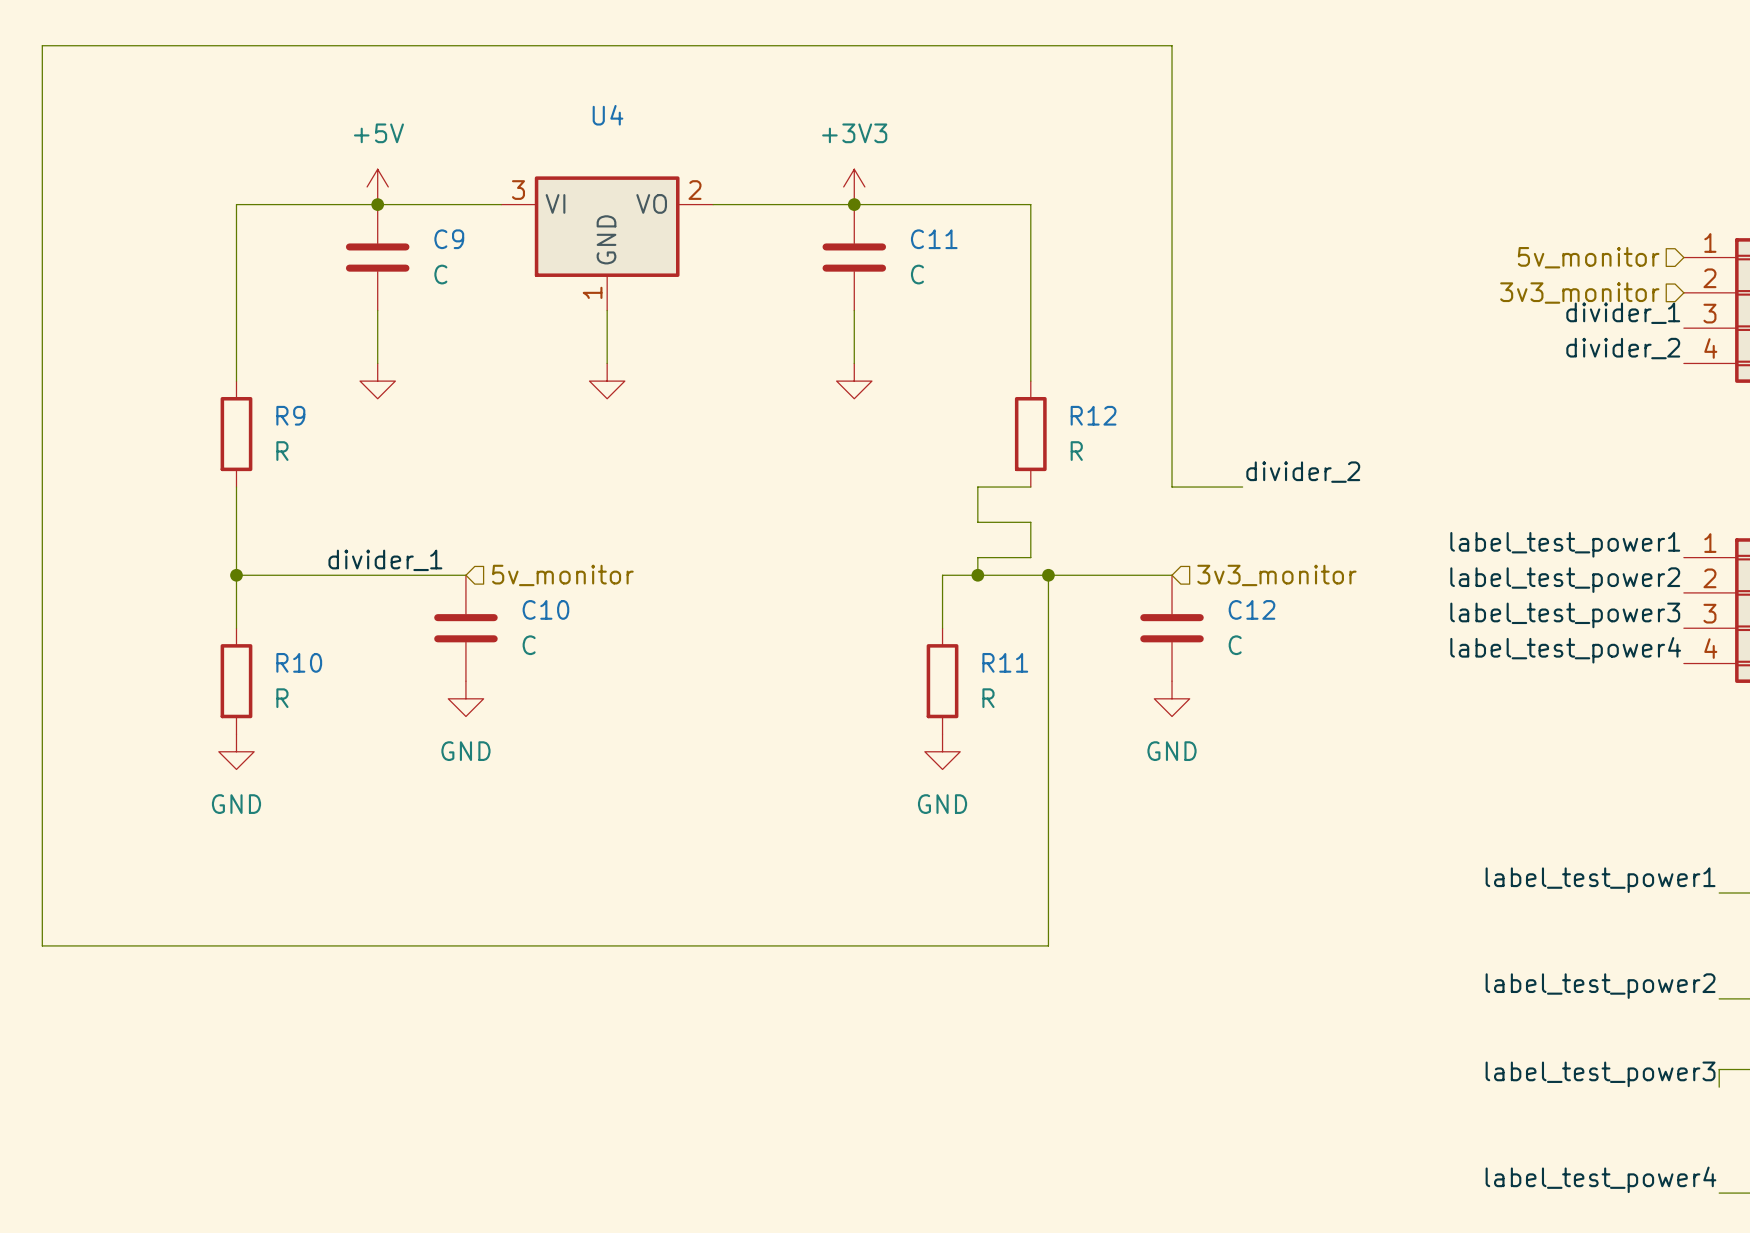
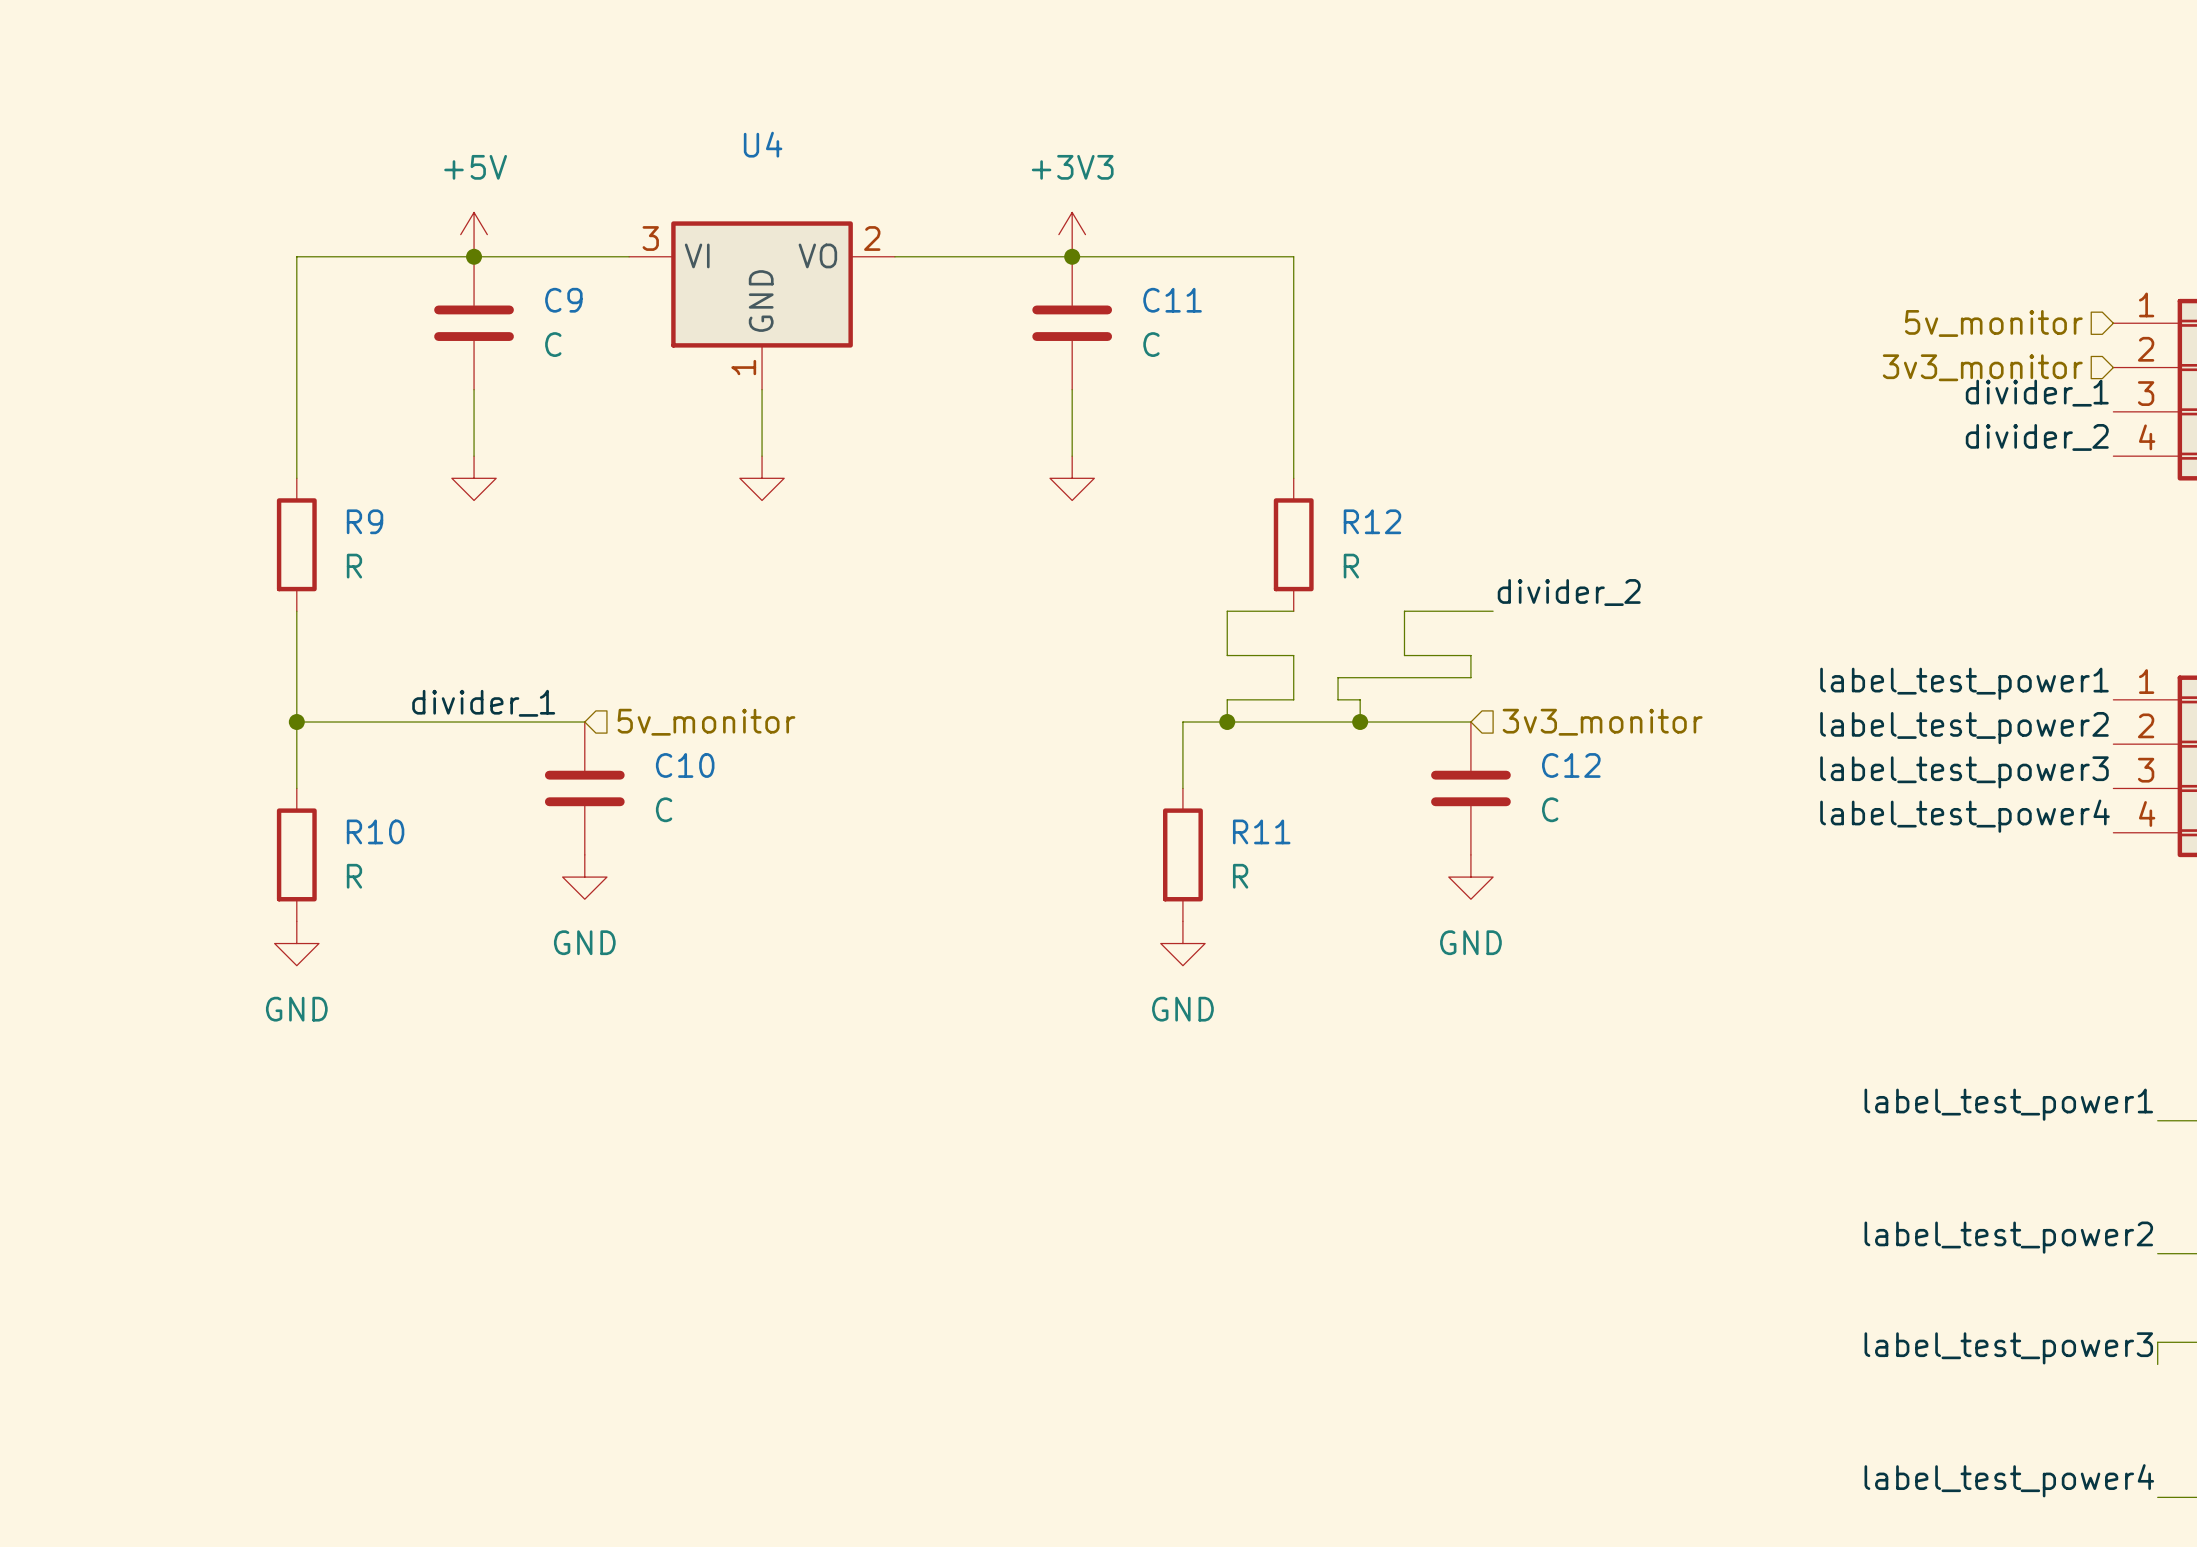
label position: divider_2 (1303, 472) -> divider_2 (1569, 592)
wire: (1172, 487) (1172, 45) (42, 45) (42, 945) (1048, 945) (1048, 575) -> (1470, 611) (1404, 611) (1404, 655) (1470, 655) (1470, 677) (1338, 677) (1338, 699) (1360, 699) (1360, 722)
wire: (1189, 487) (1242, 487) -> none
junction position: (1048, 575) -> (1360, 722)

